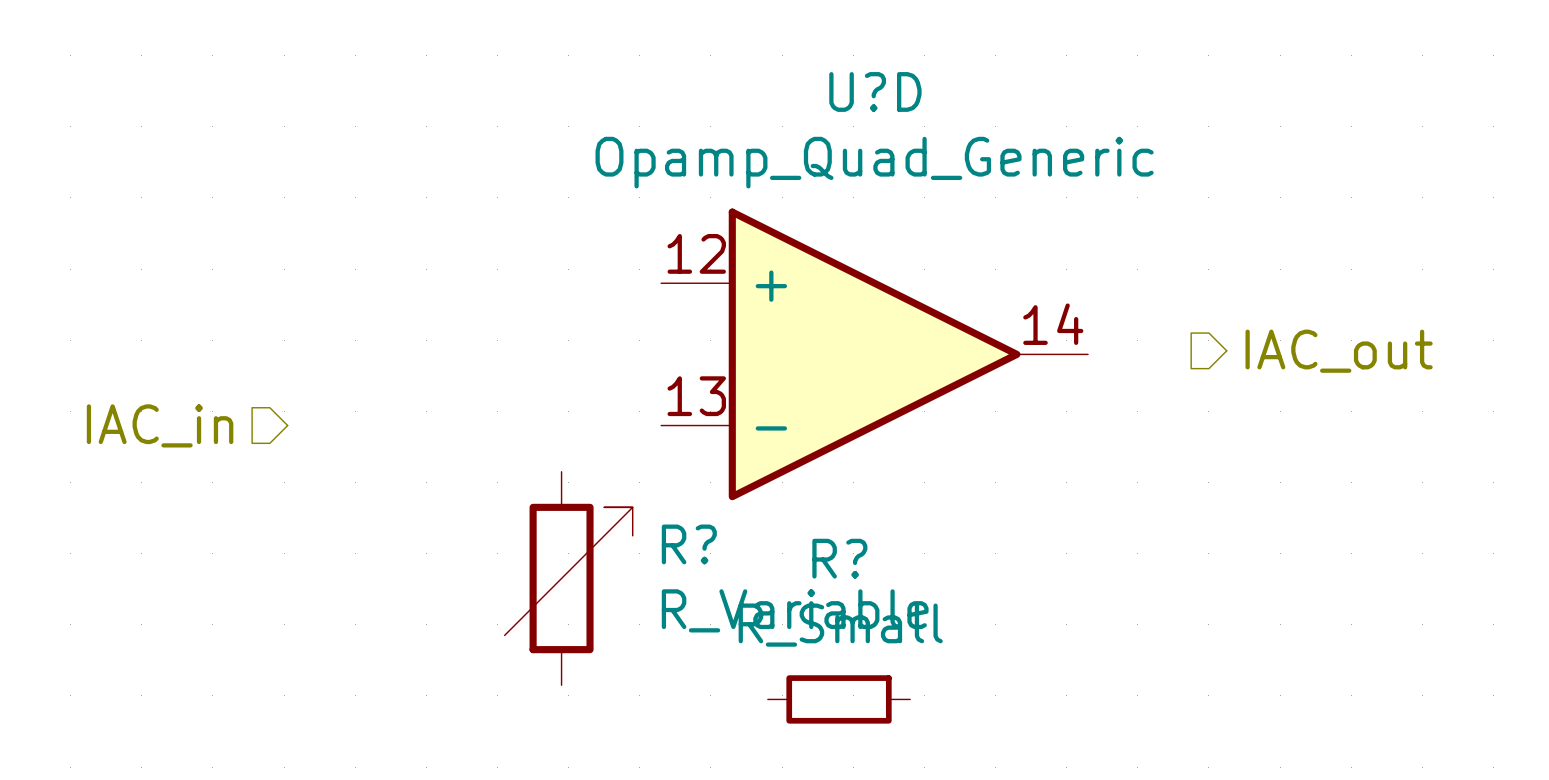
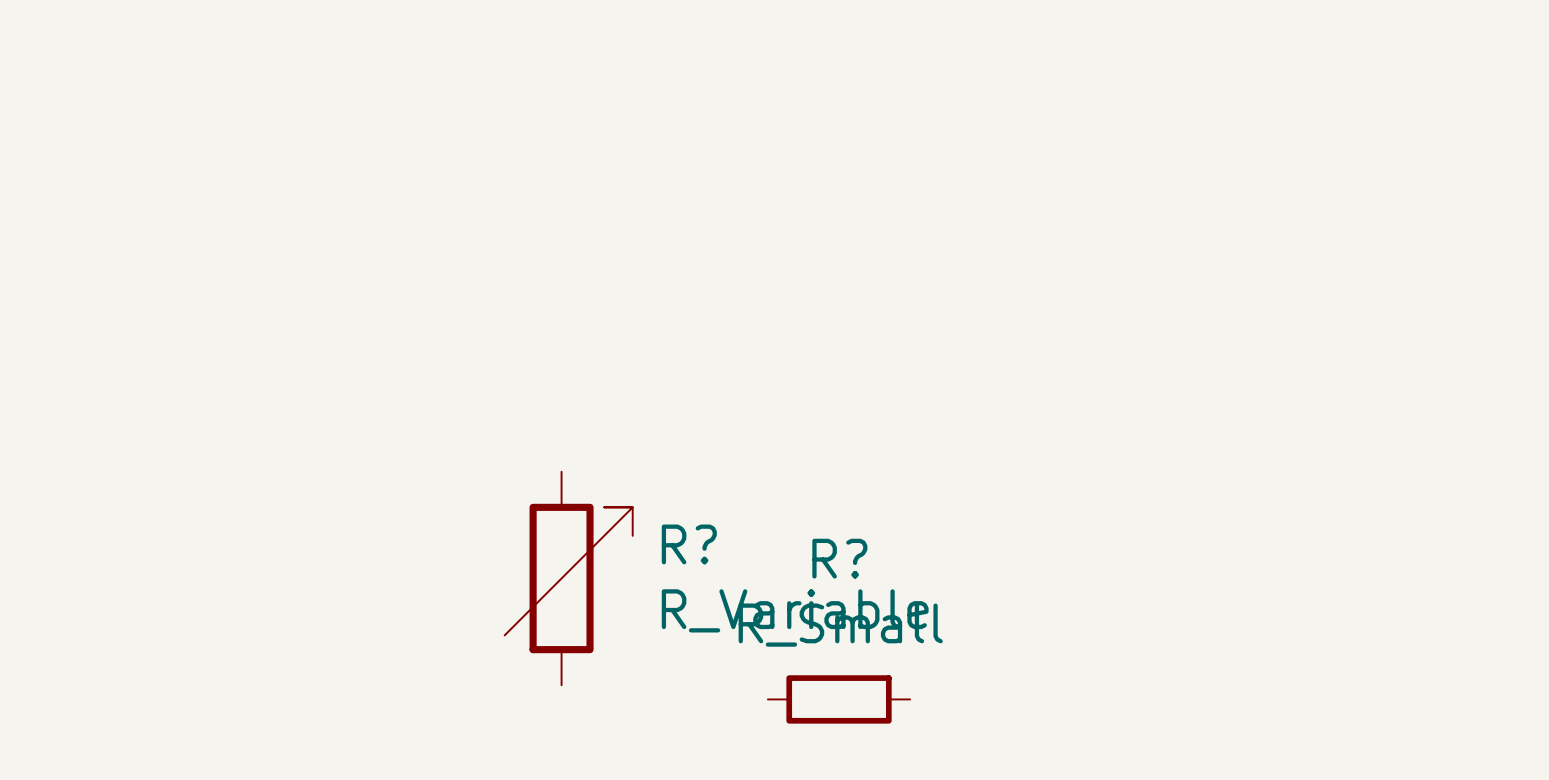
hierarchical label: IAC_out (1339, 351) -> none
U?D: Opamp_Quad_Generic (874, 354) -> none
hierarchical label: IAC_in (160, 425) -> none

